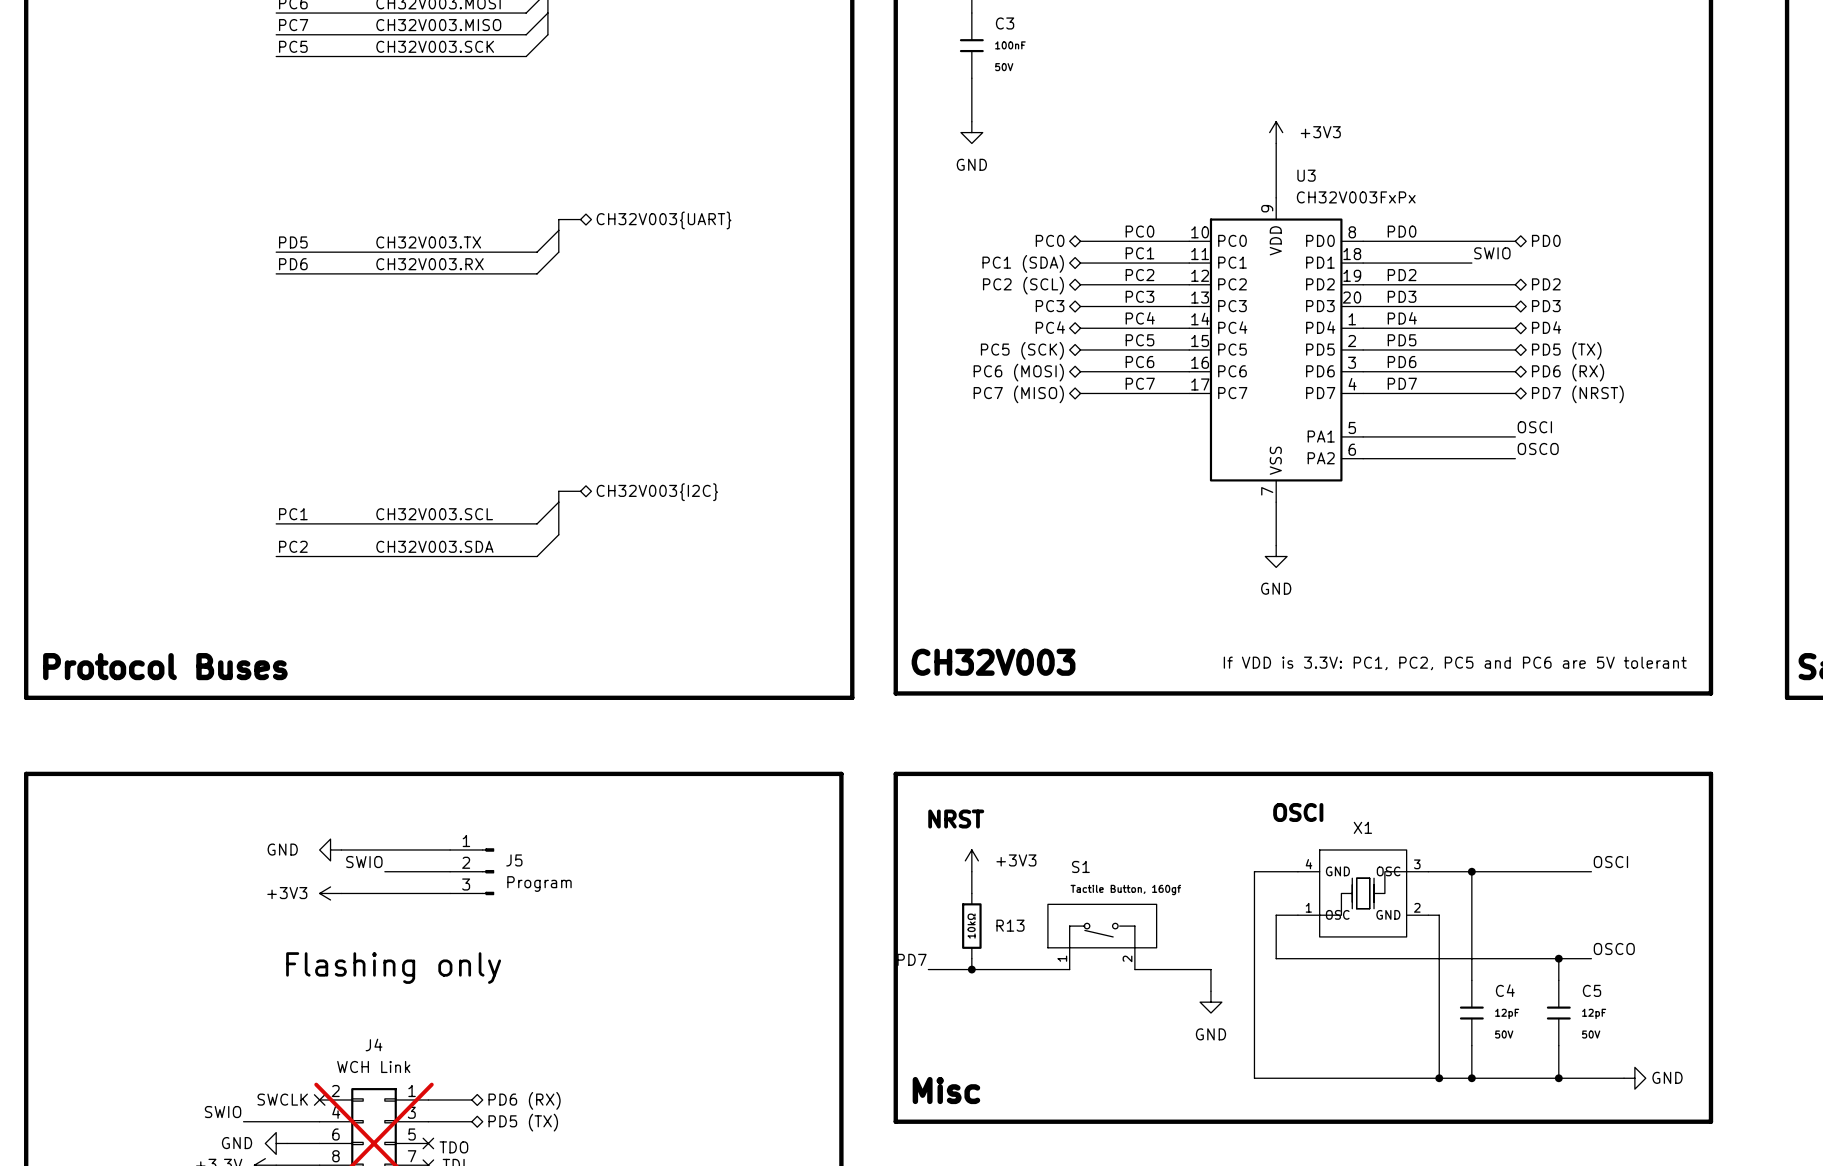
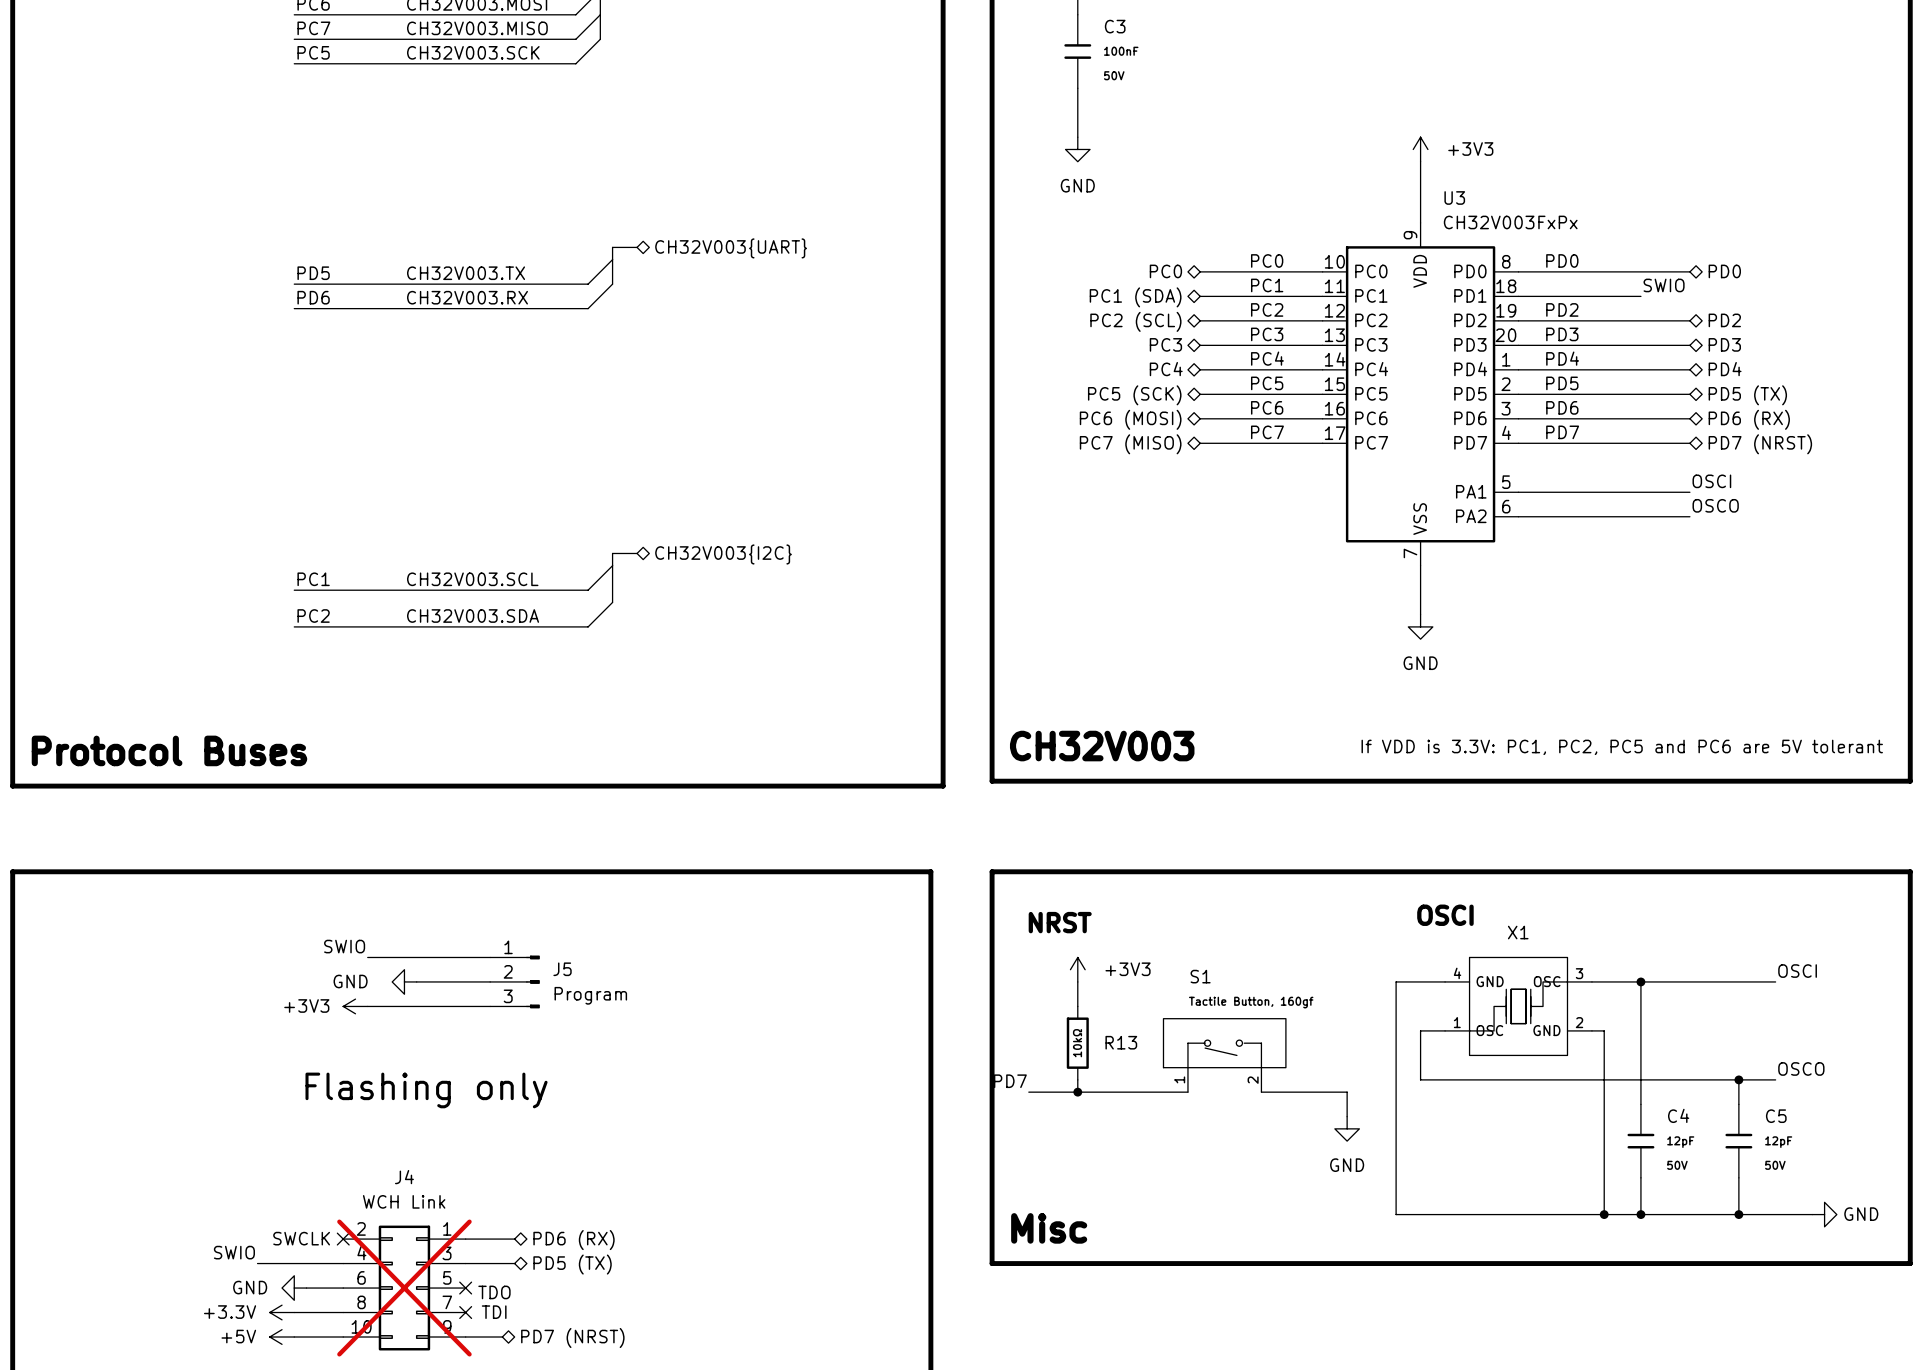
power symbol position: GND (330, 849) -> GND (404, 981)
label position: SWIO (364, 862) -> SWIO (344, 946)

